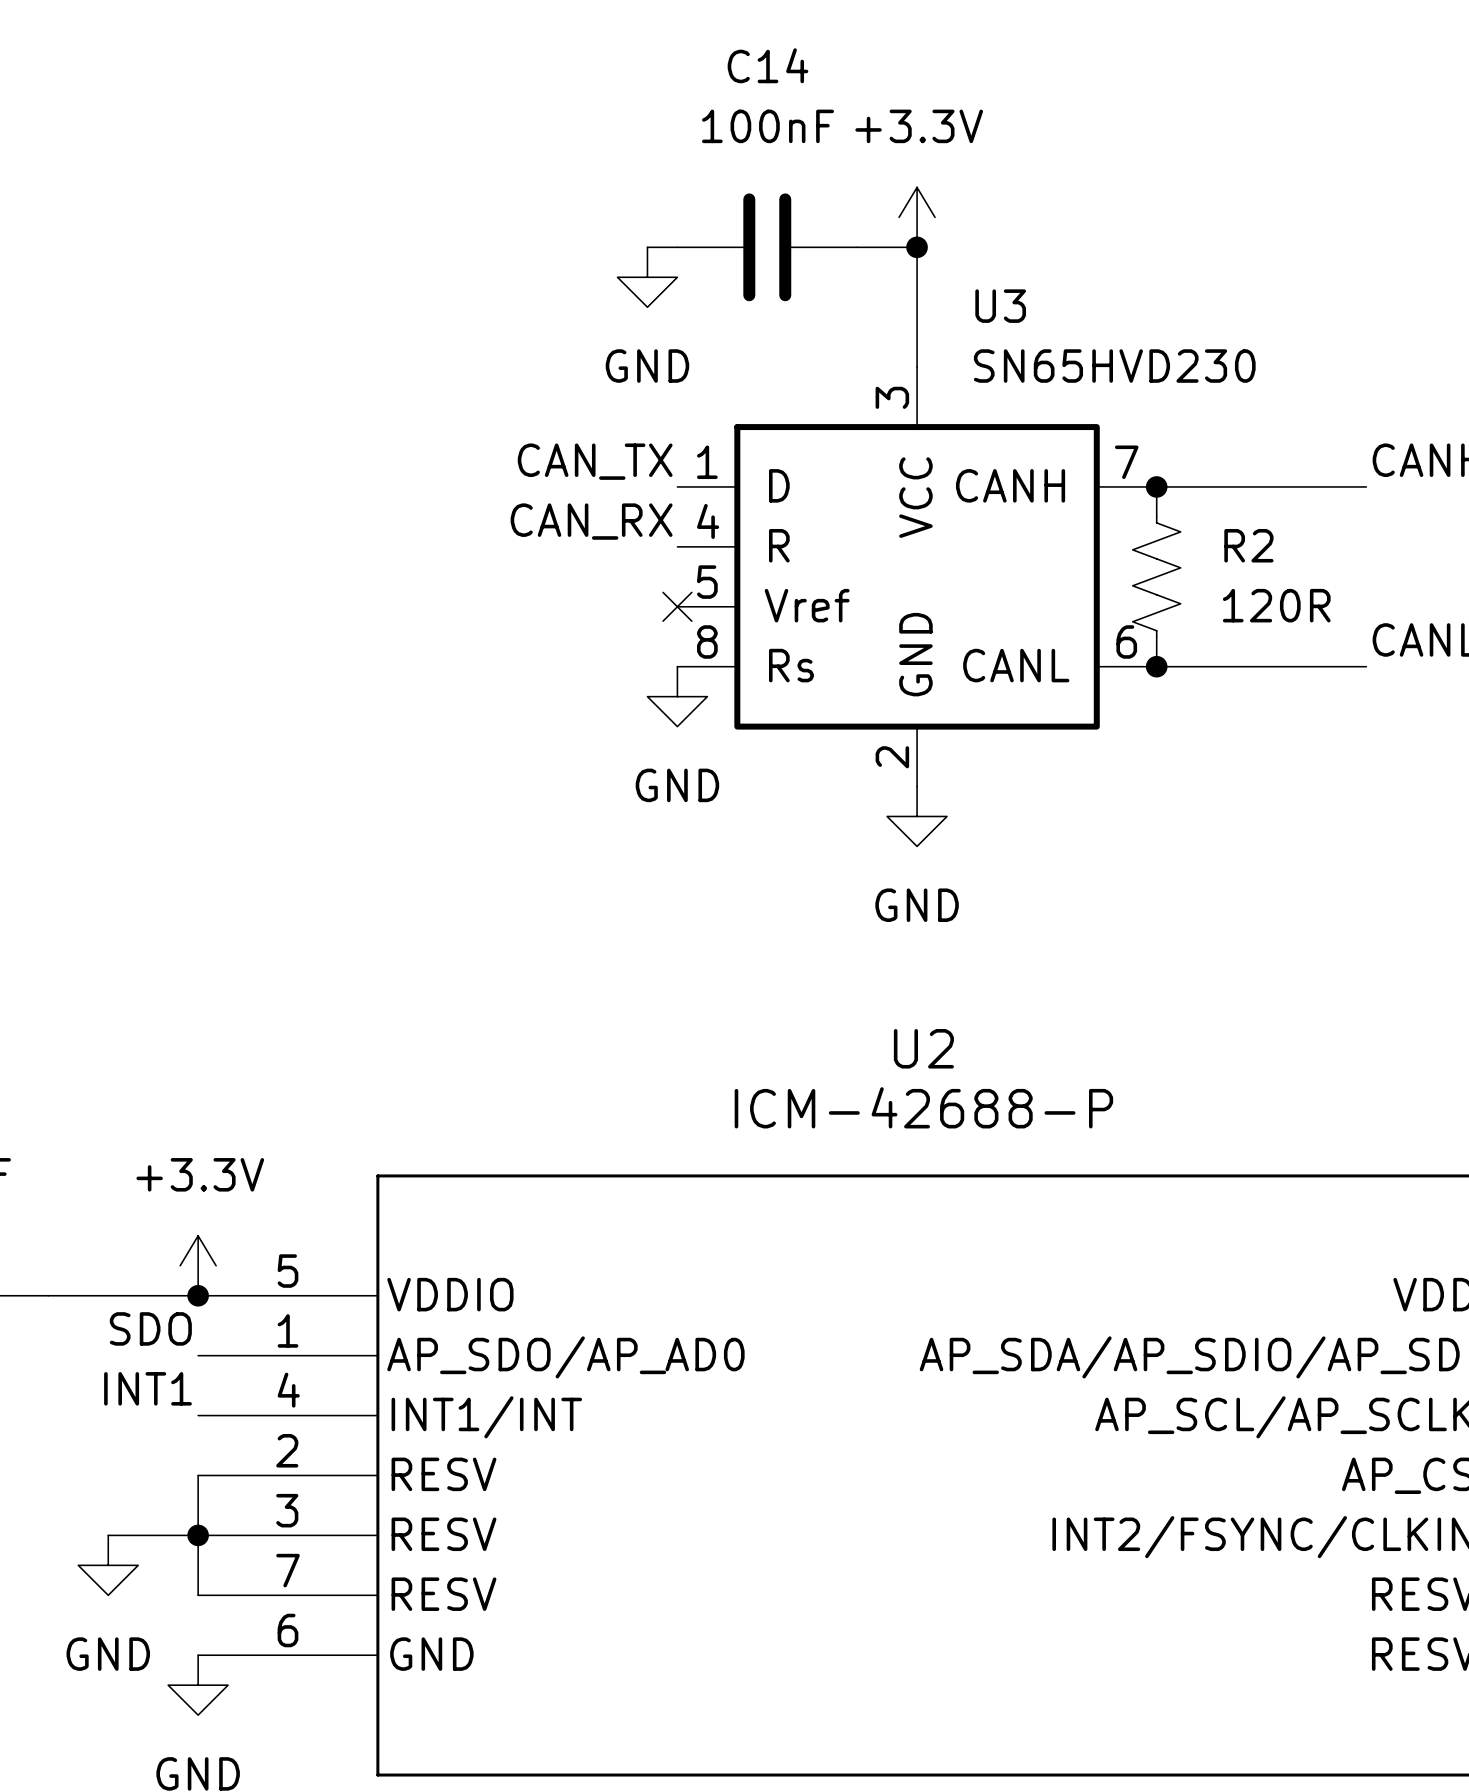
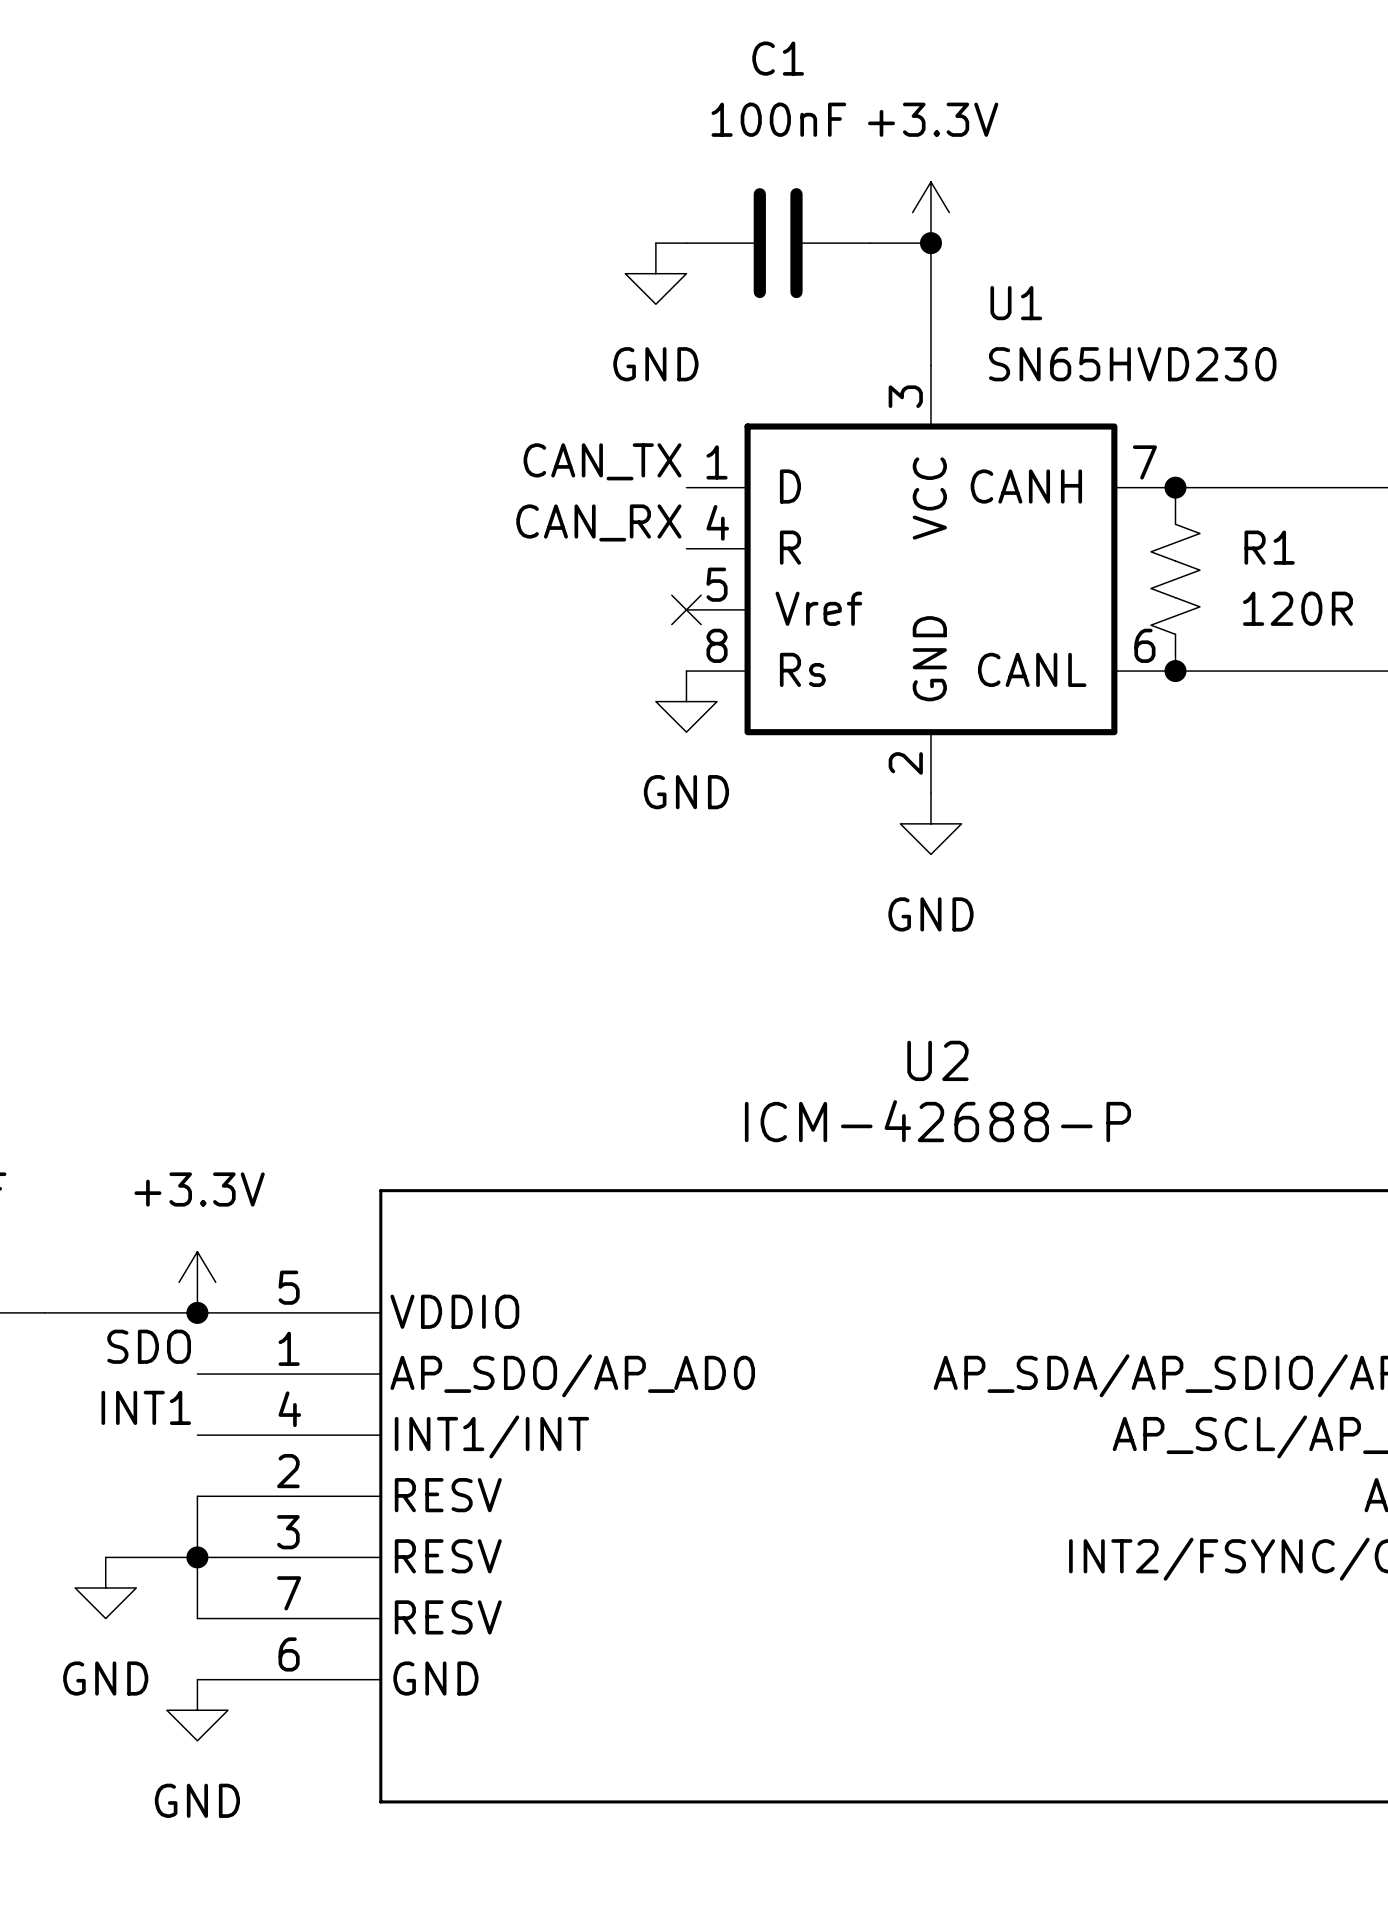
C14 name: C14 (767, 65) -> C1 (778, 58)
U3 name: U3 (1000, 306) -> U1 (1016, 303)
R2 name: R2 (1248, 545) -> R1 (1269, 547)

